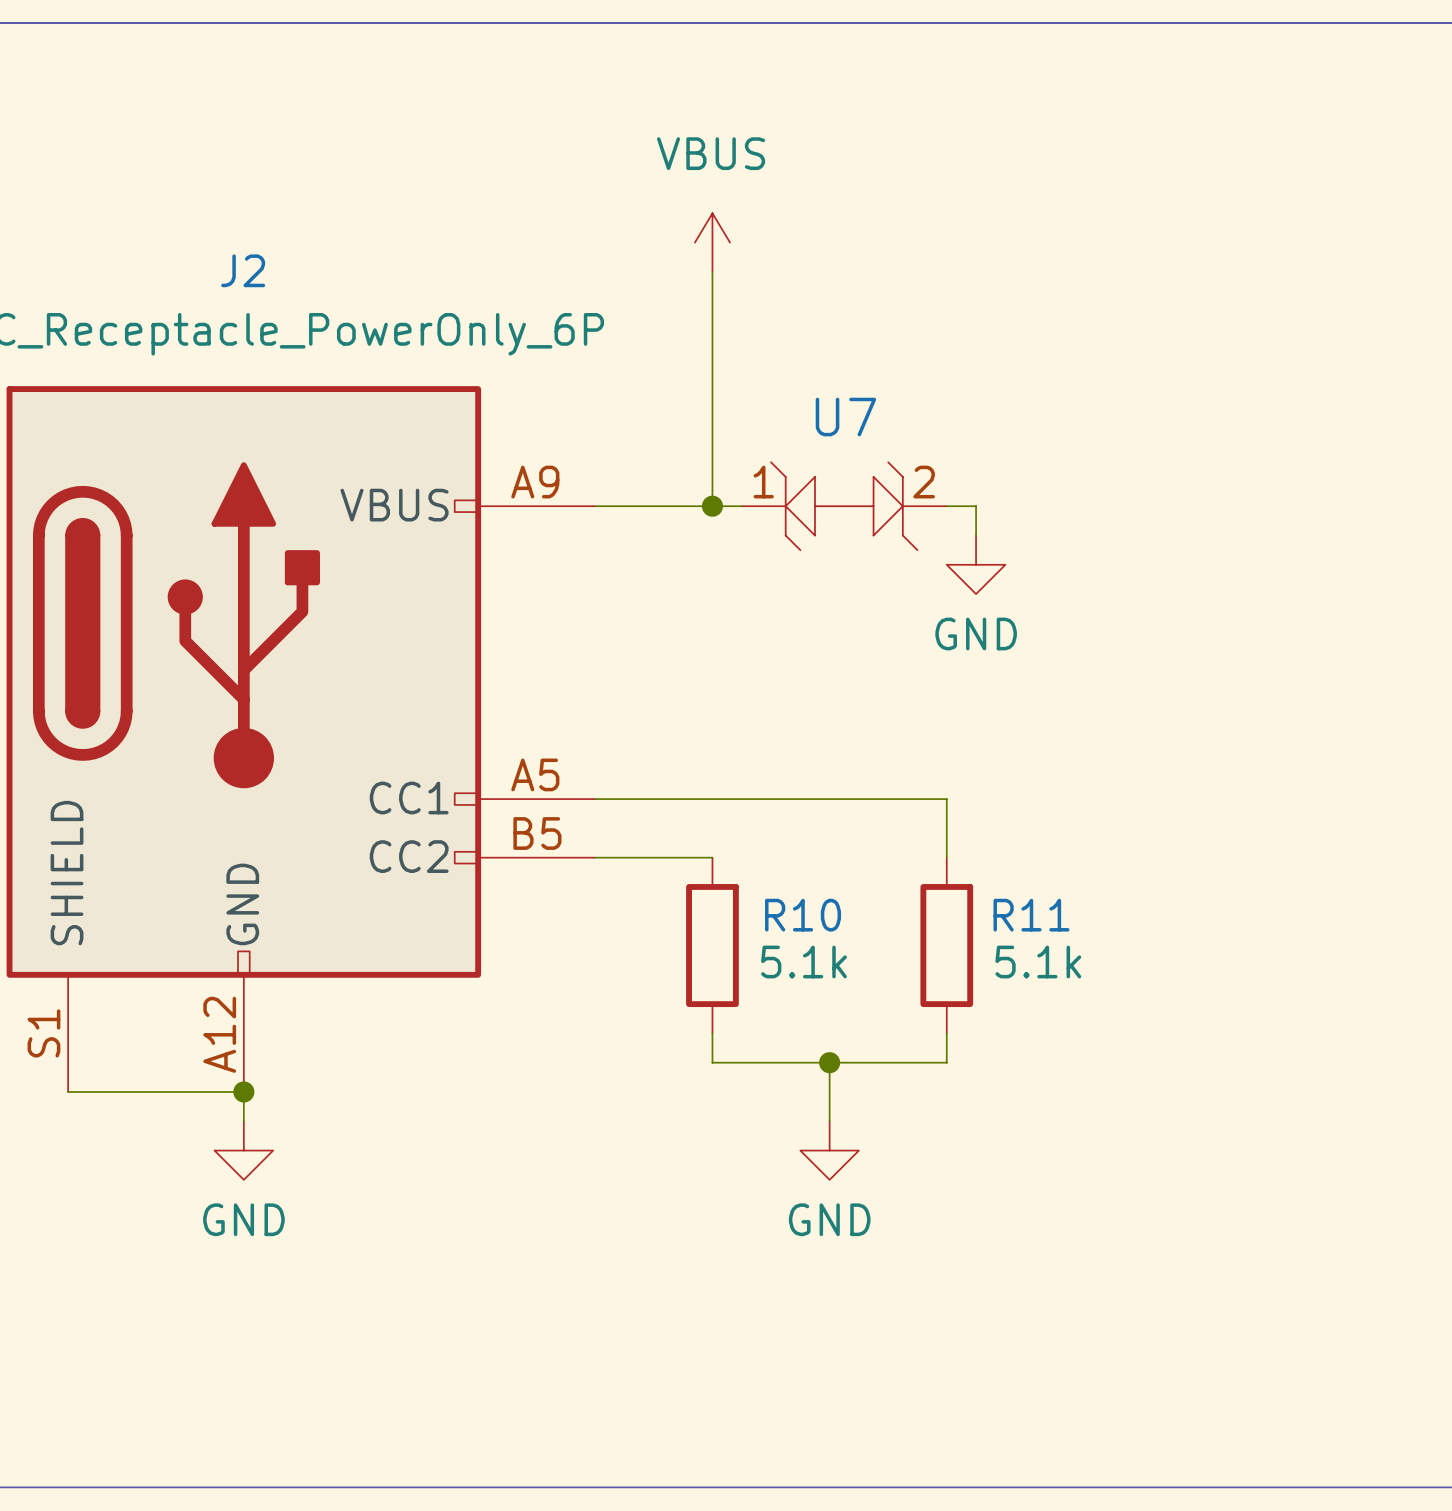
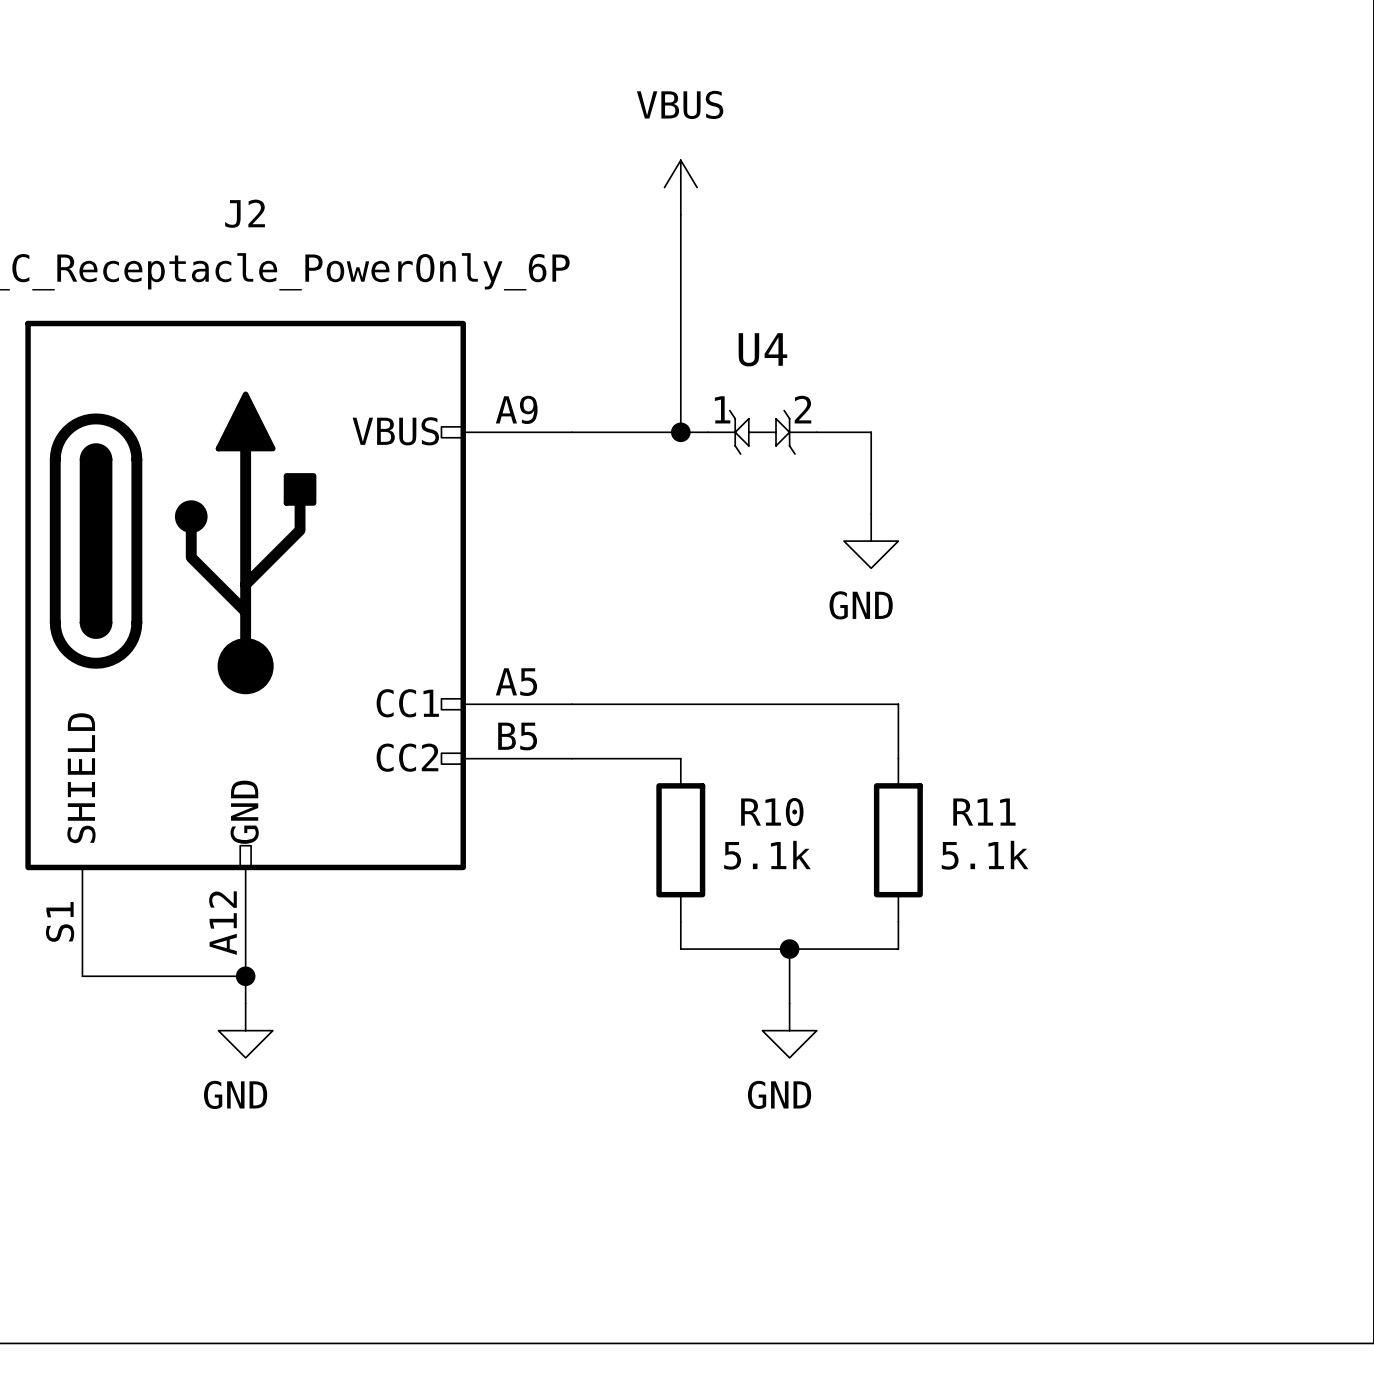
U4: none -> (762, 432)
U7: (844, 506) -> none
wire: none -> (816, 432) (871, 432) (871, 513)
wire: (946, 506) (976, 506) (976, 535) -> none
power symbol position: GND (976, 564) -> GND (871, 541)

